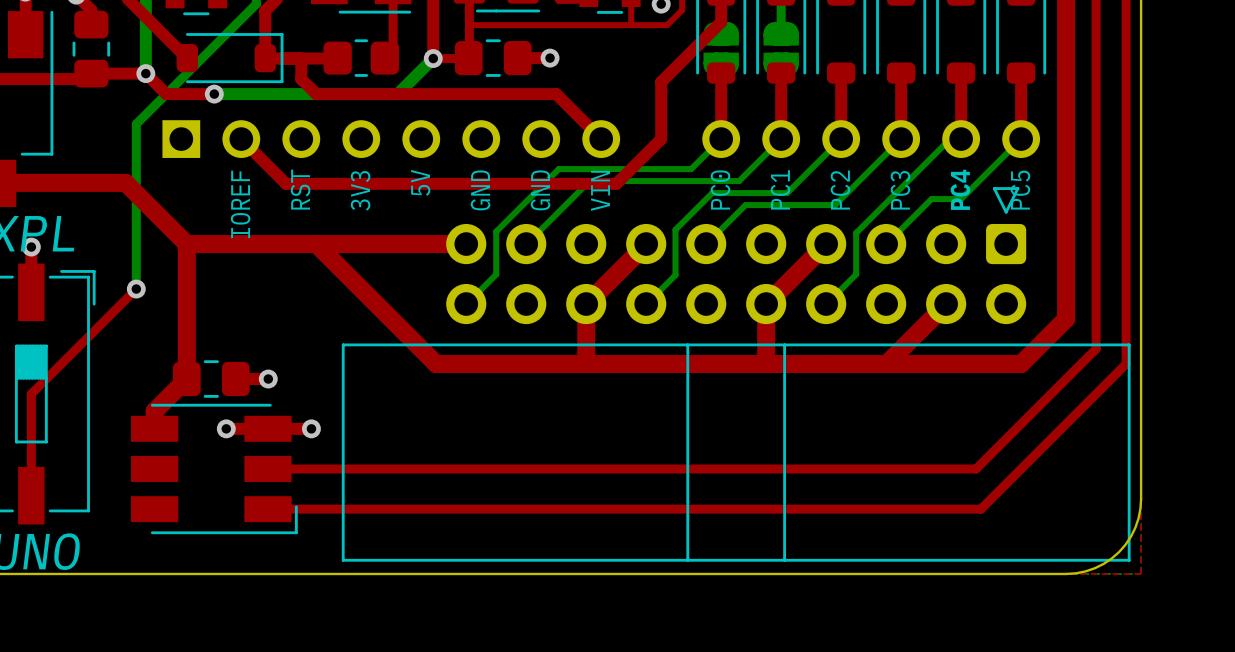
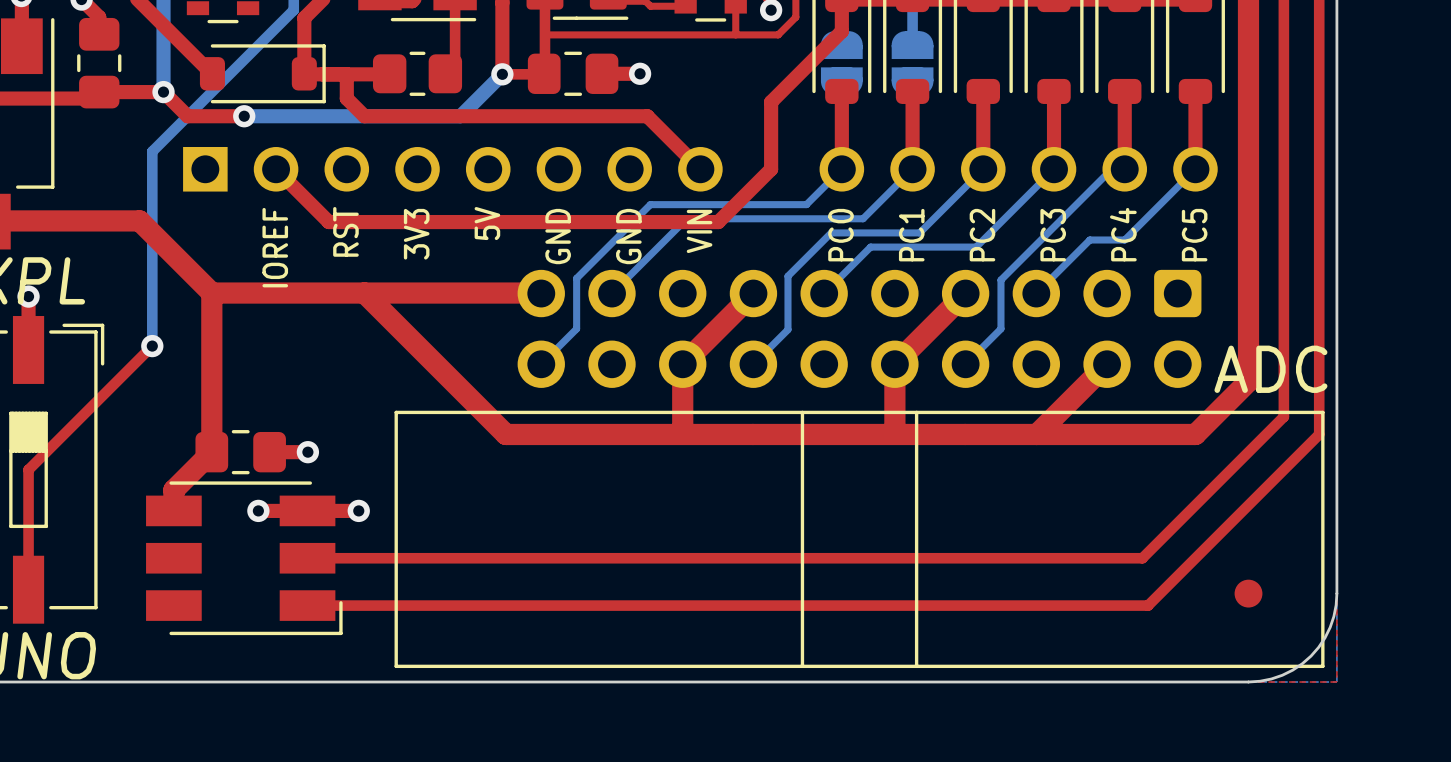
part footprint: [341, 187, 1131, 562] -> [394, 269, 1325, 669]
part value: none -> ADC (1270, 369)
part: none -> (1248, 593)

